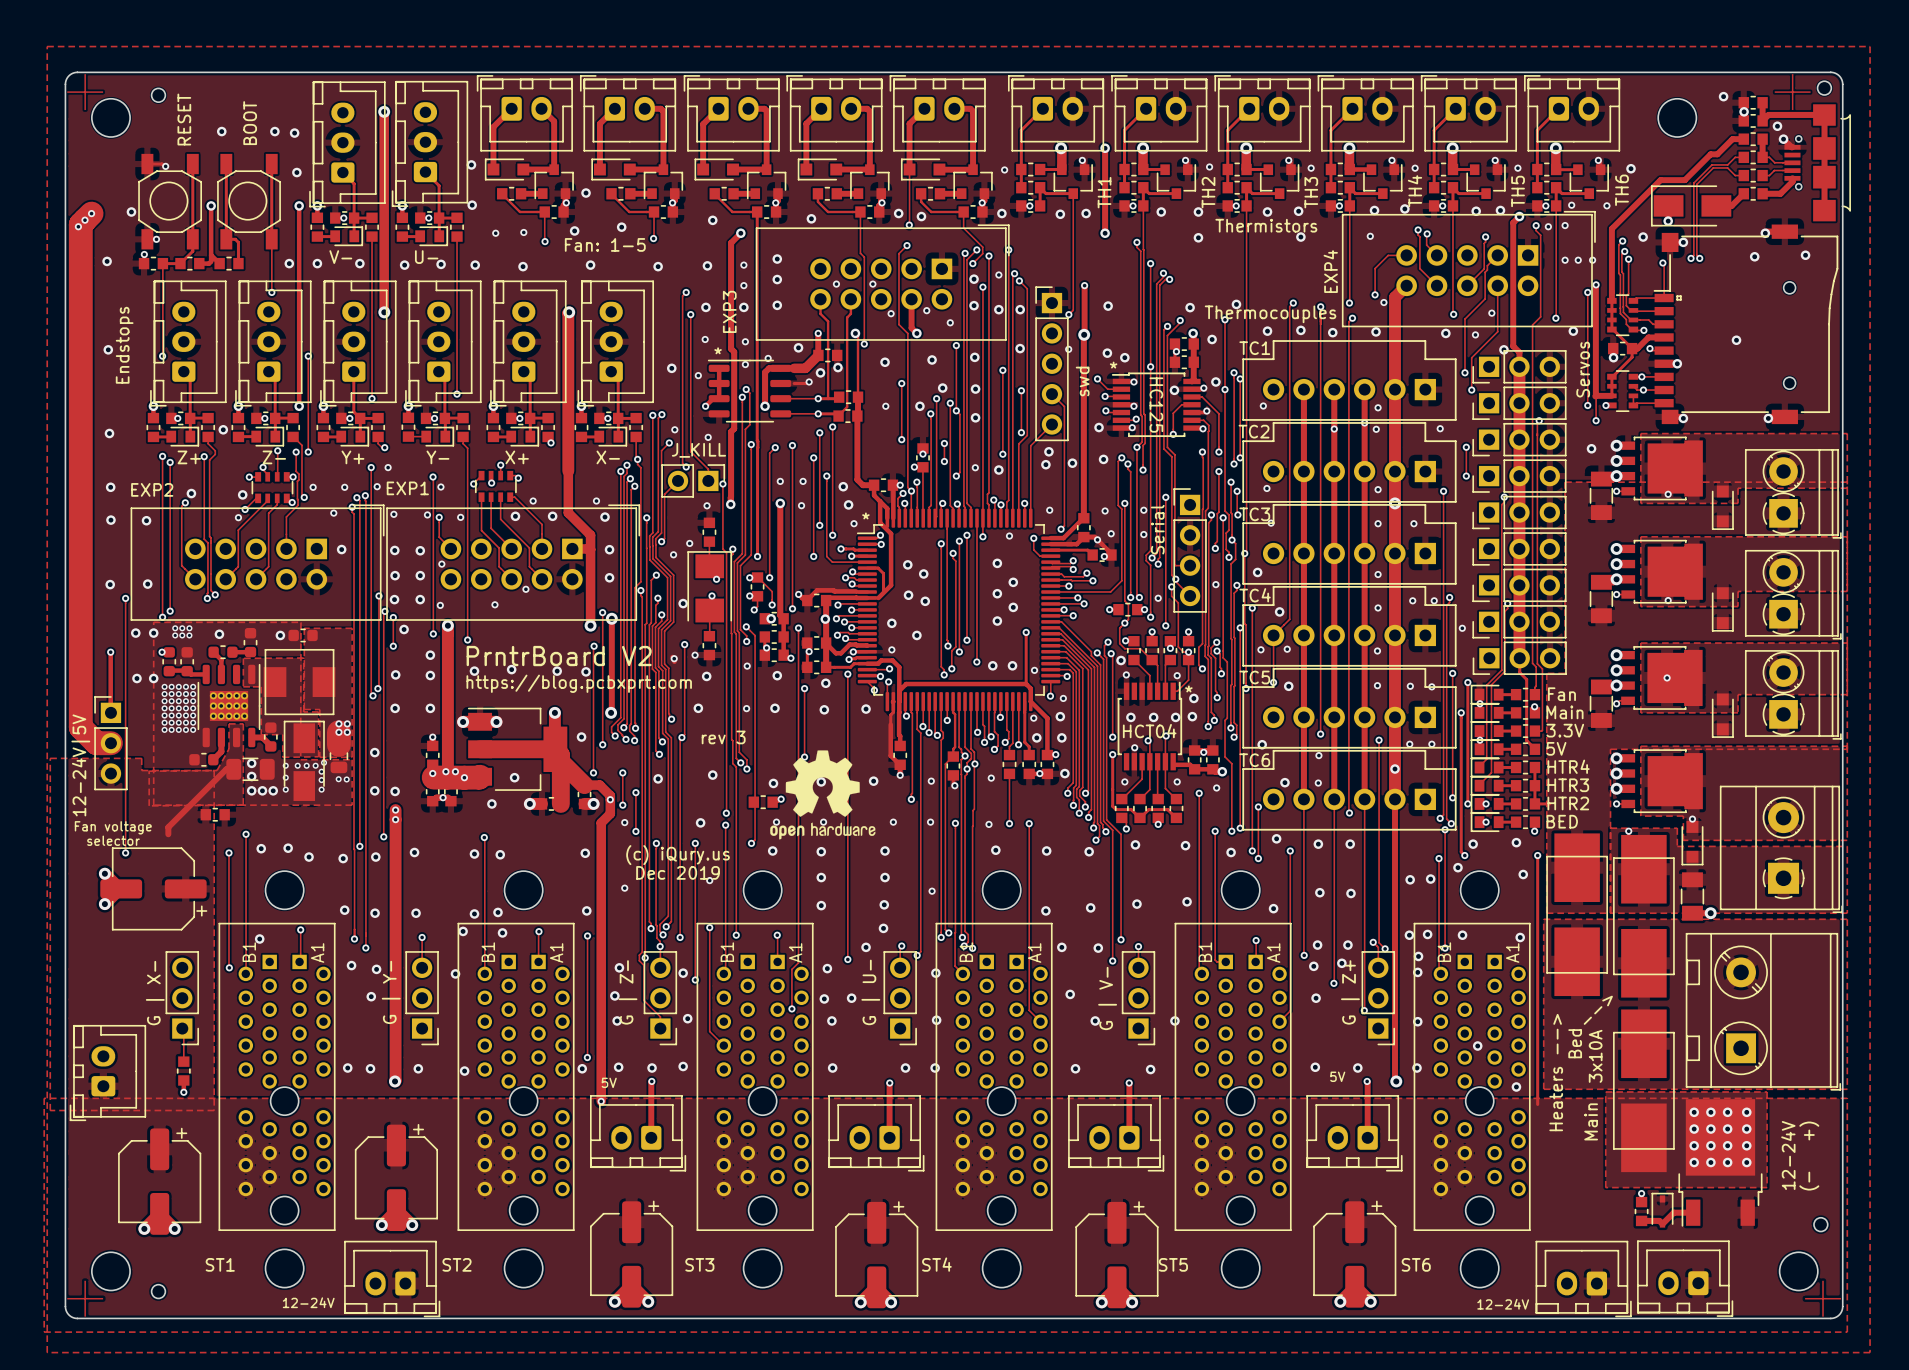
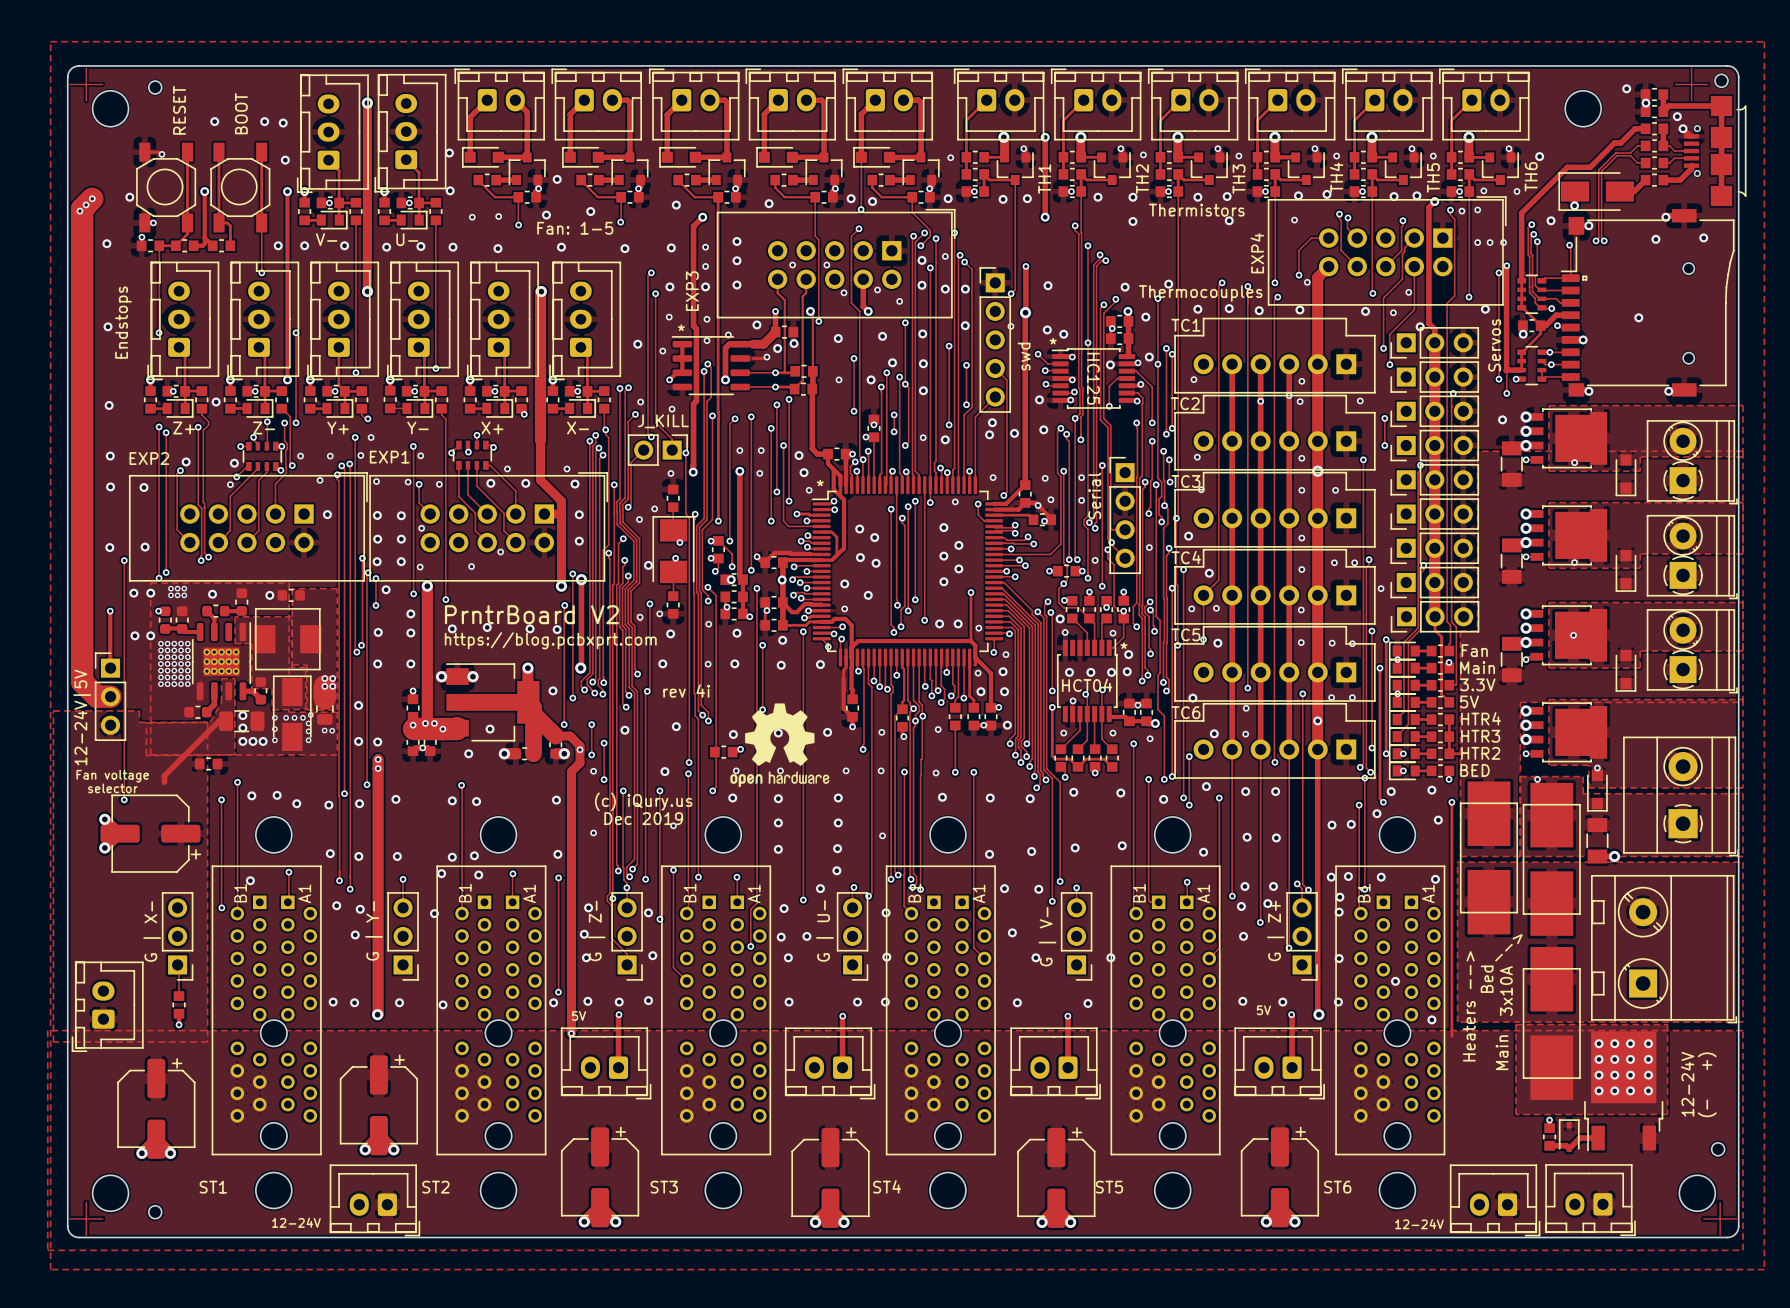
text: rev 3 (723, 737) -> rev 4i (686, 691)

